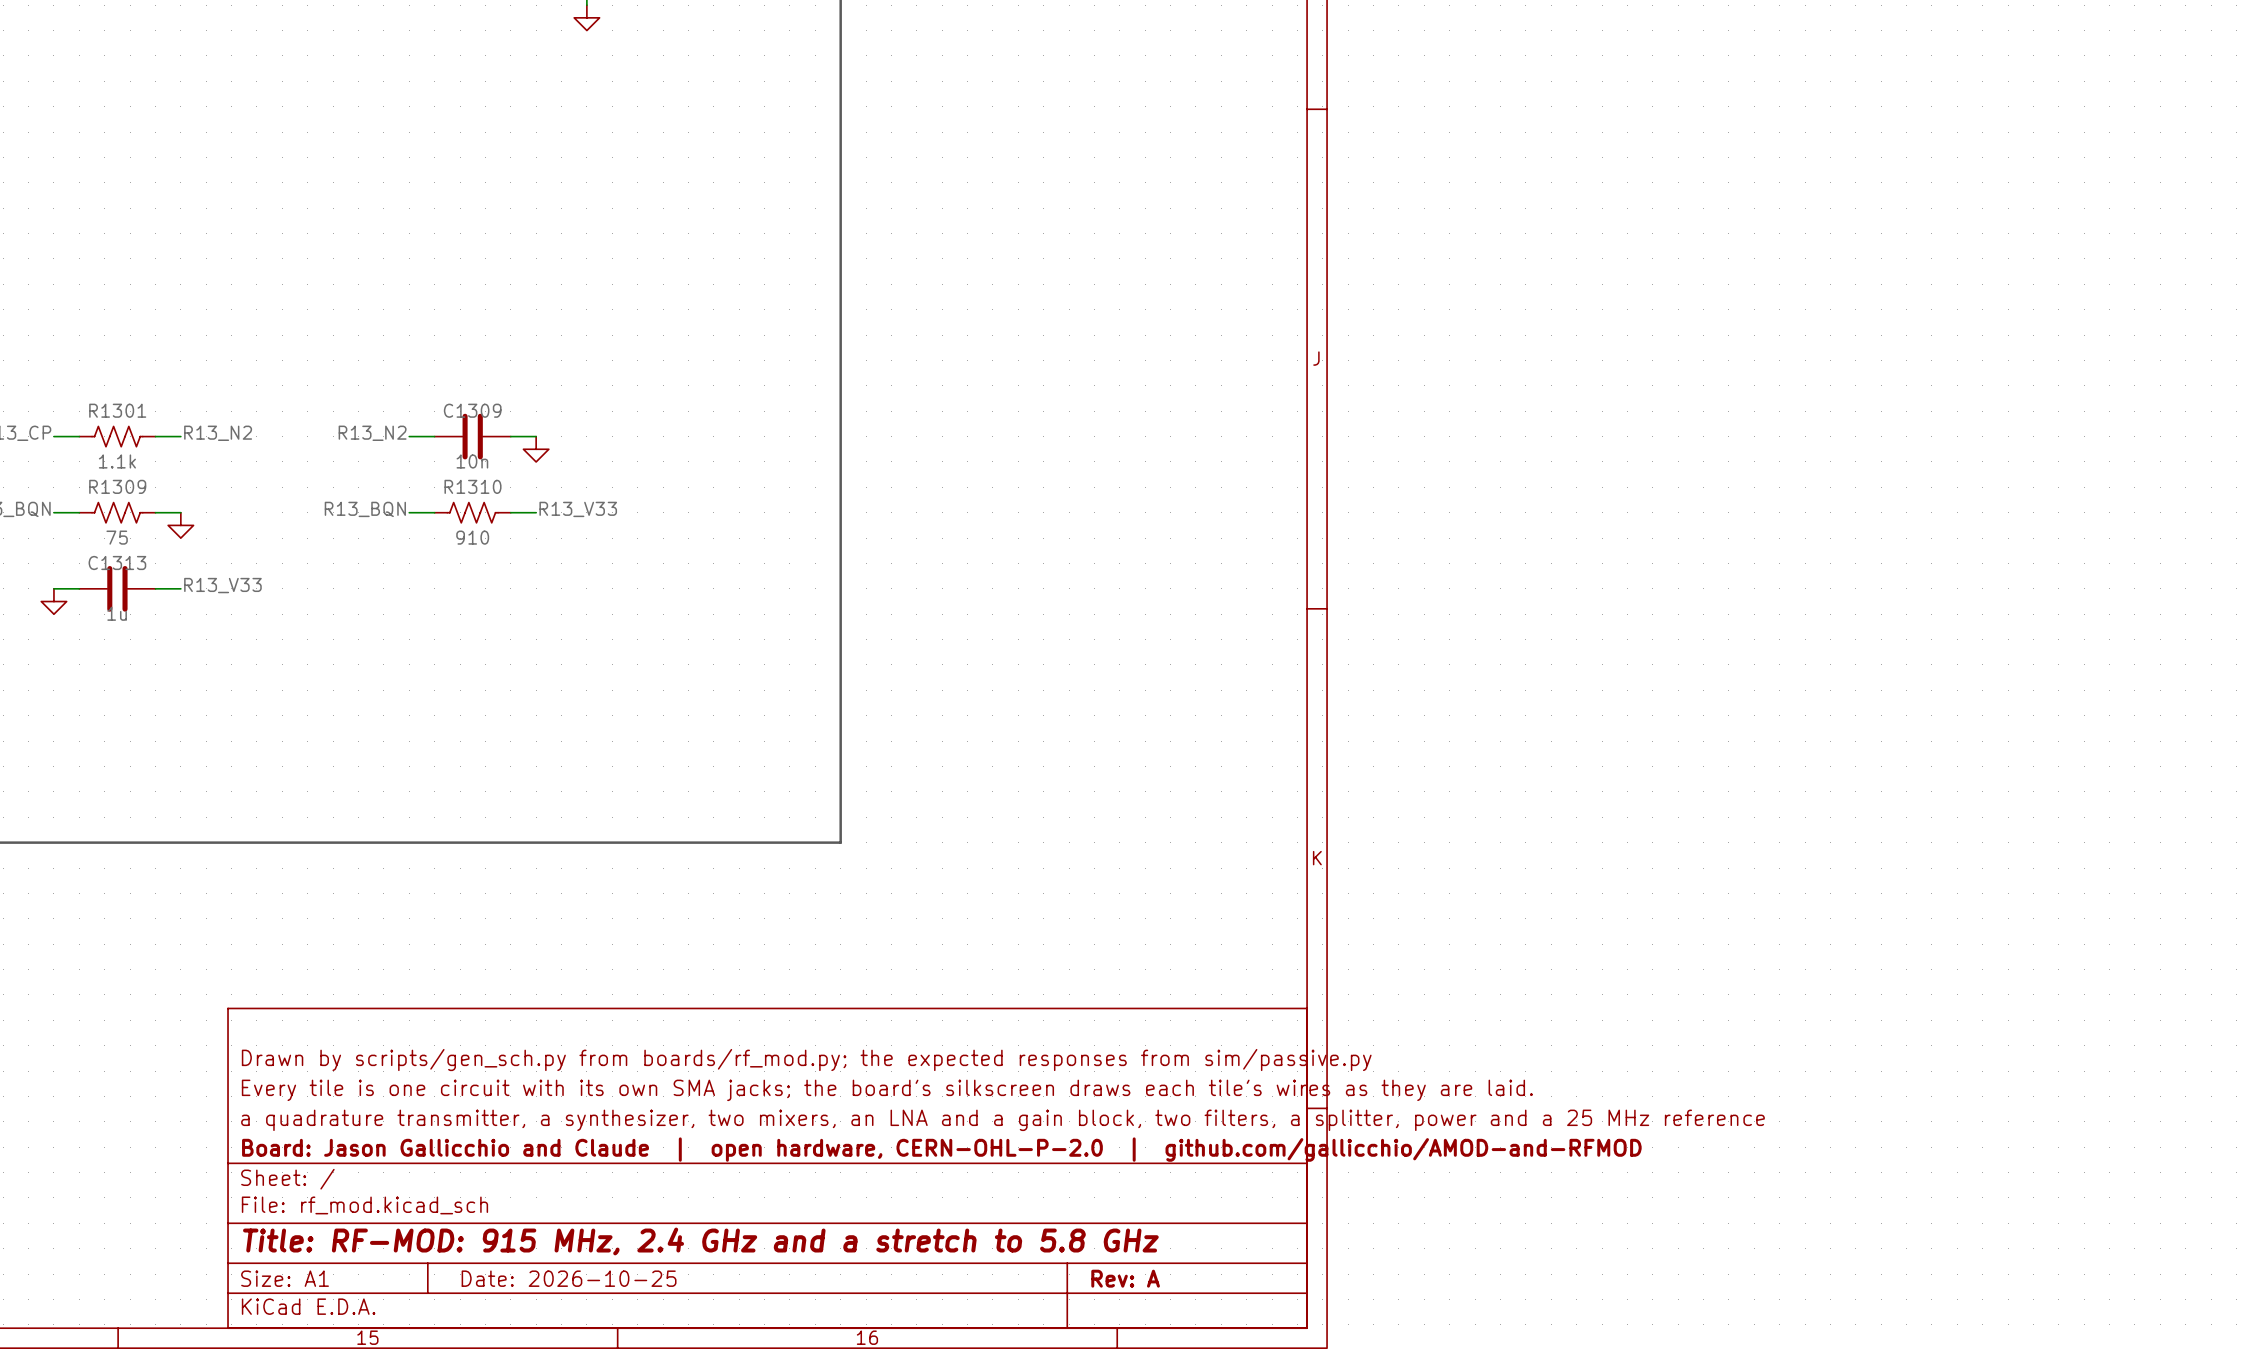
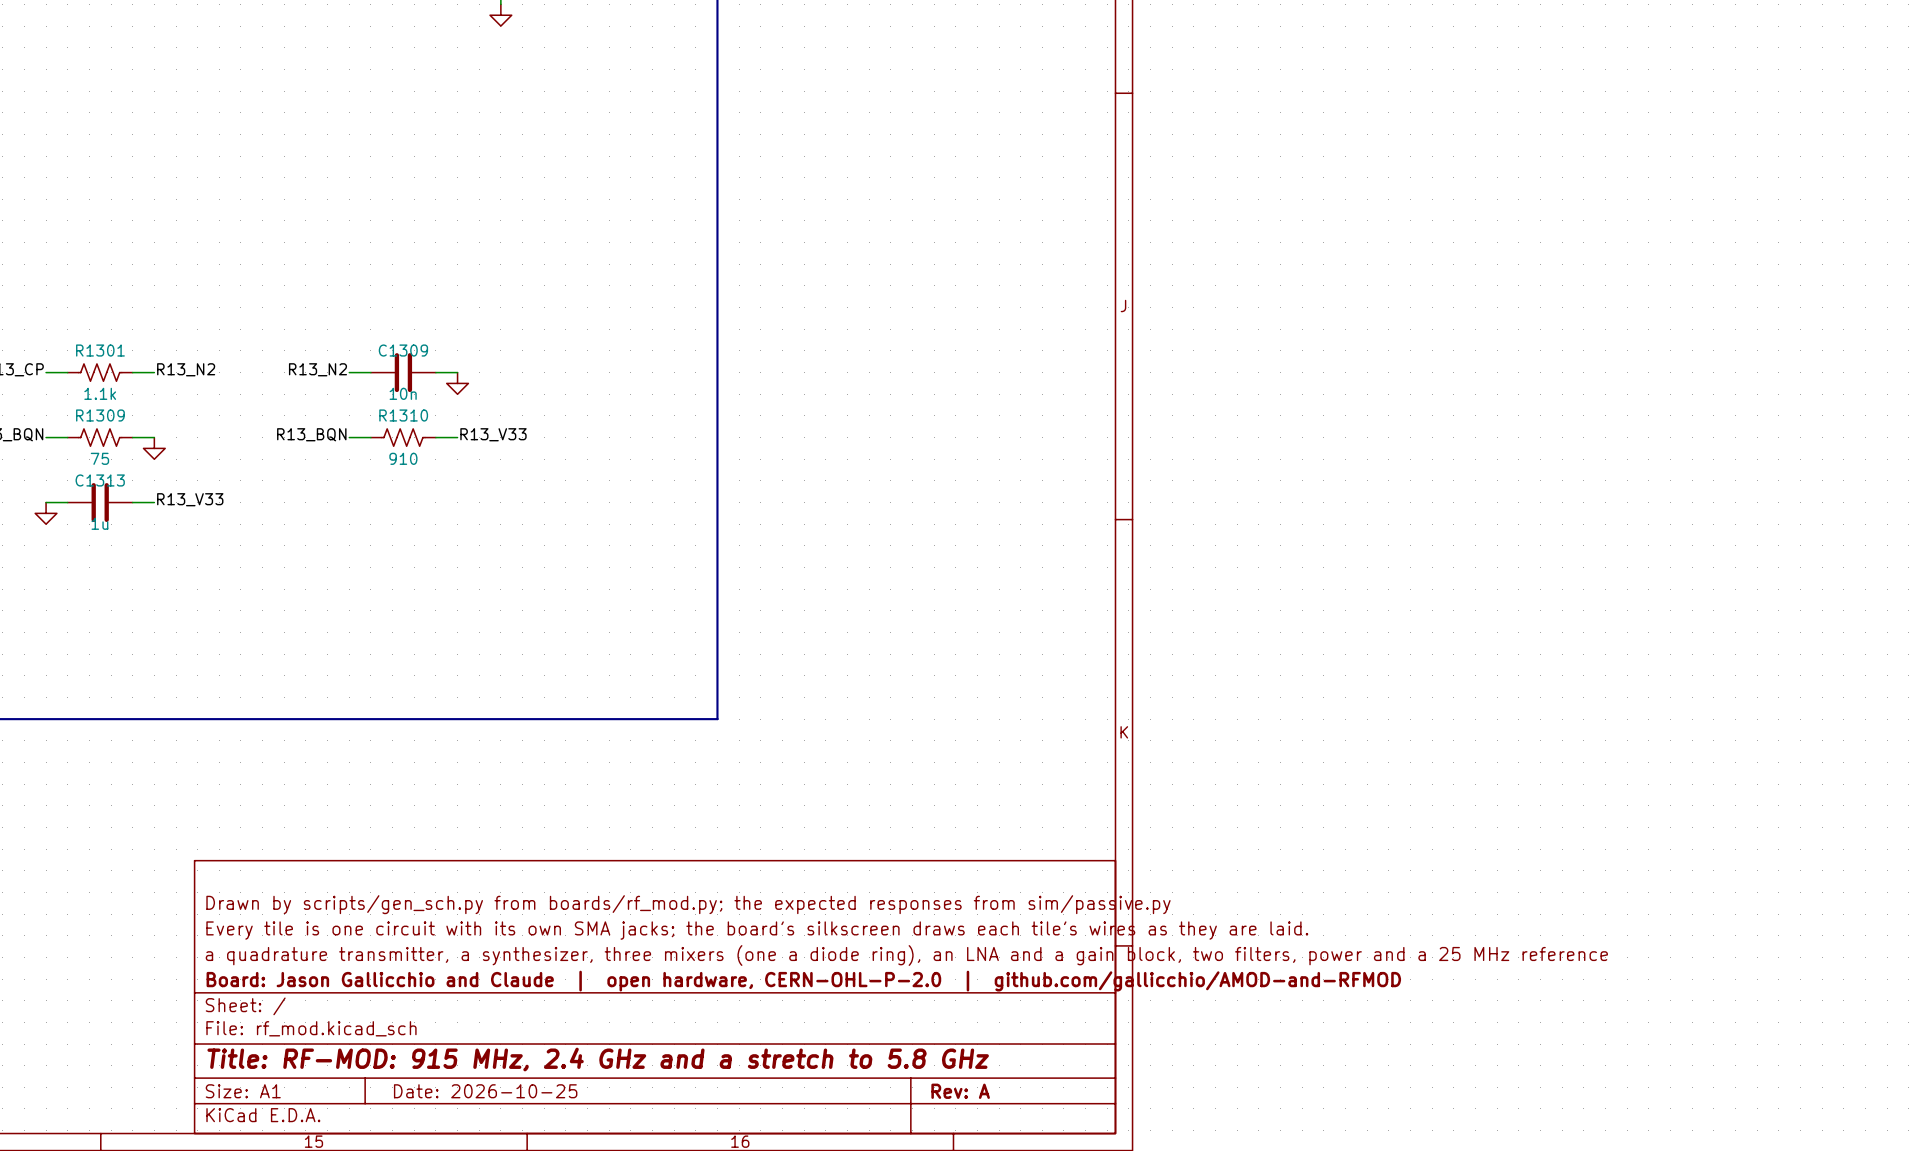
title block: a quadrature transmitter, a synthesizer, two mixers, an LNA and a gain block, two filters, a splitter, power and a 25 MHz reference (1002, 1120) -> a quadrature transmitter, a synthesizer, three mixers (one a diode ring), an LNA and a gain block, two filters, power and a 25 MHz reference (906, 955)

